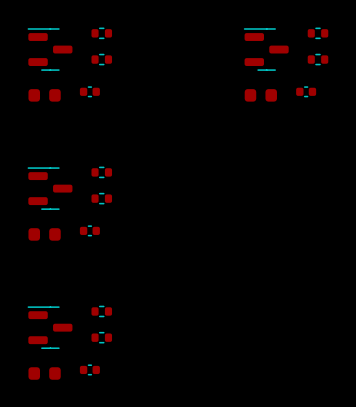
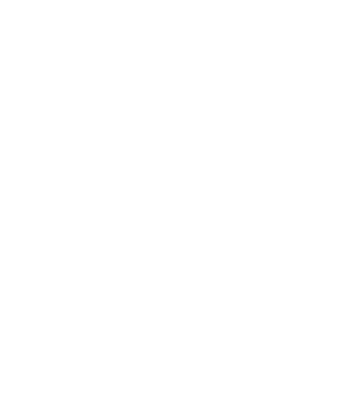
part: (101, 33) -> none
part: (317, 33) -> none
part: (50, 49) -> none
part: (266, 49) -> none
part: (101, 59) -> none
part: (317, 59) -> none
part: (89, 91) -> none
part: (306, 91) -> none
part: (44, 95) -> none
part: (260, 95) -> none
part: (101, 172) -> none
part: (50, 188) -> none
part: (101, 198) -> none
part: (89, 230) -> none
part: (44, 234) -> none
part: (101, 311) -> none
part: (50, 327) -> none
part: (101, 337) -> none
part: (89, 369) -> none
part: (44, 373) -> none

